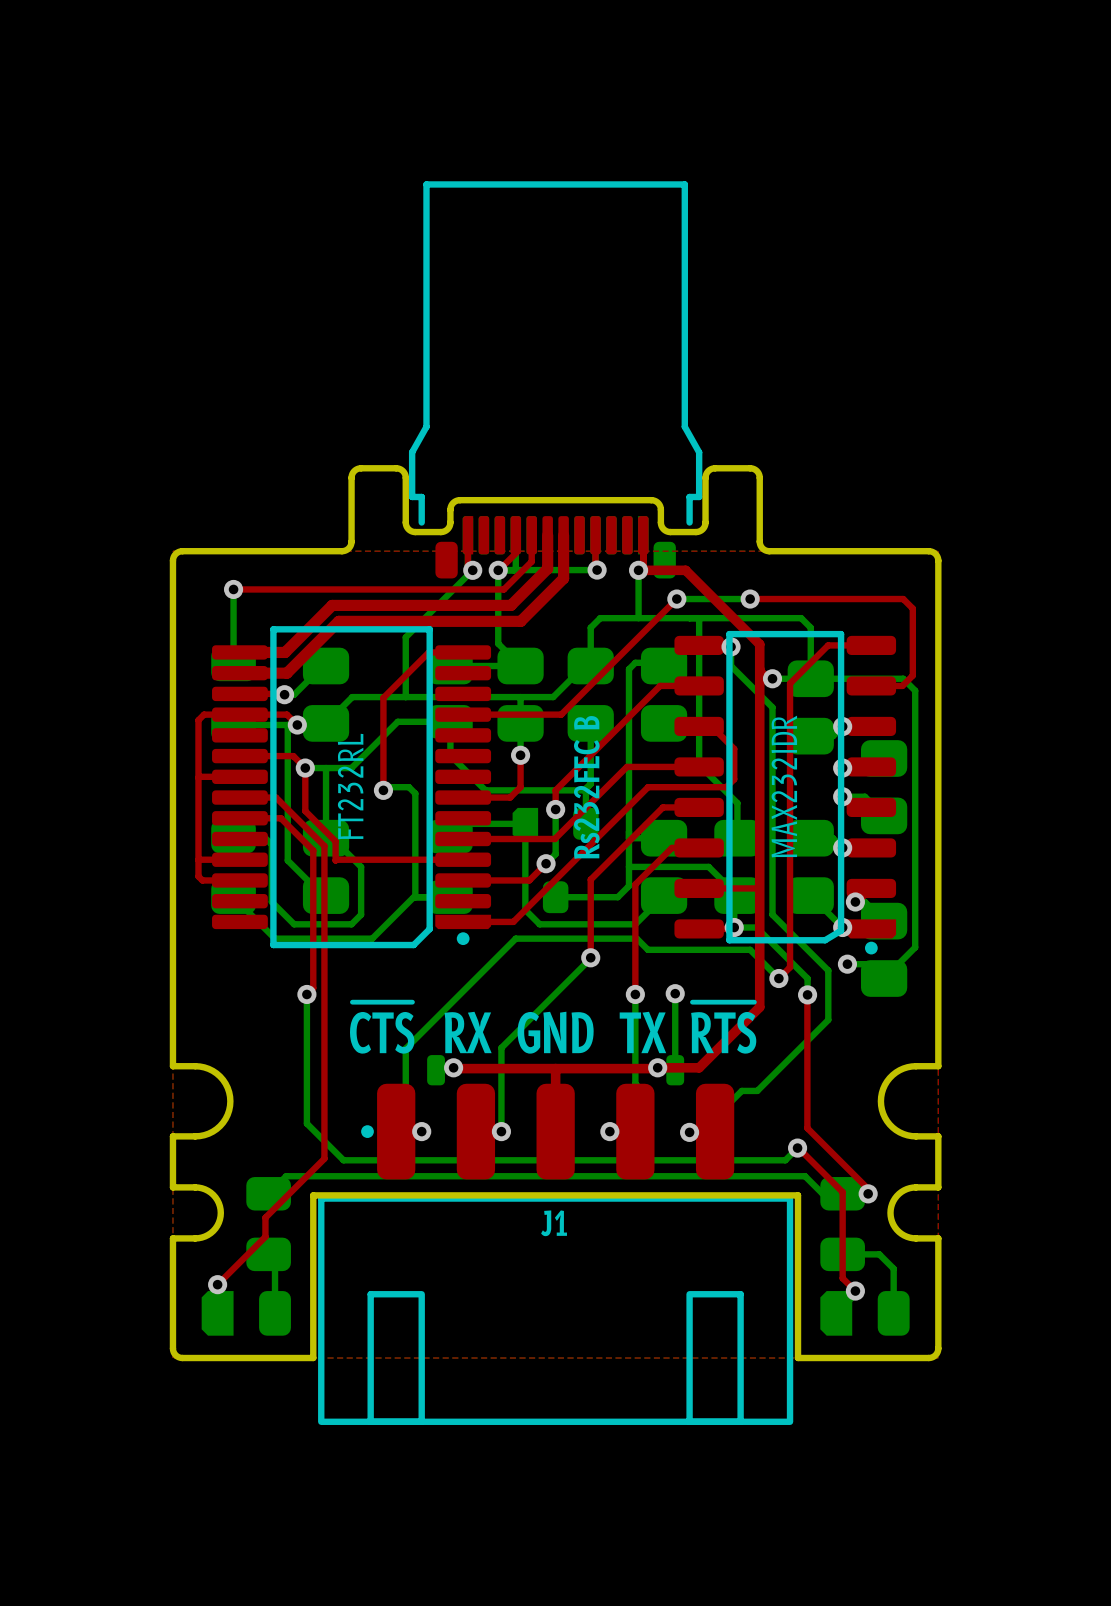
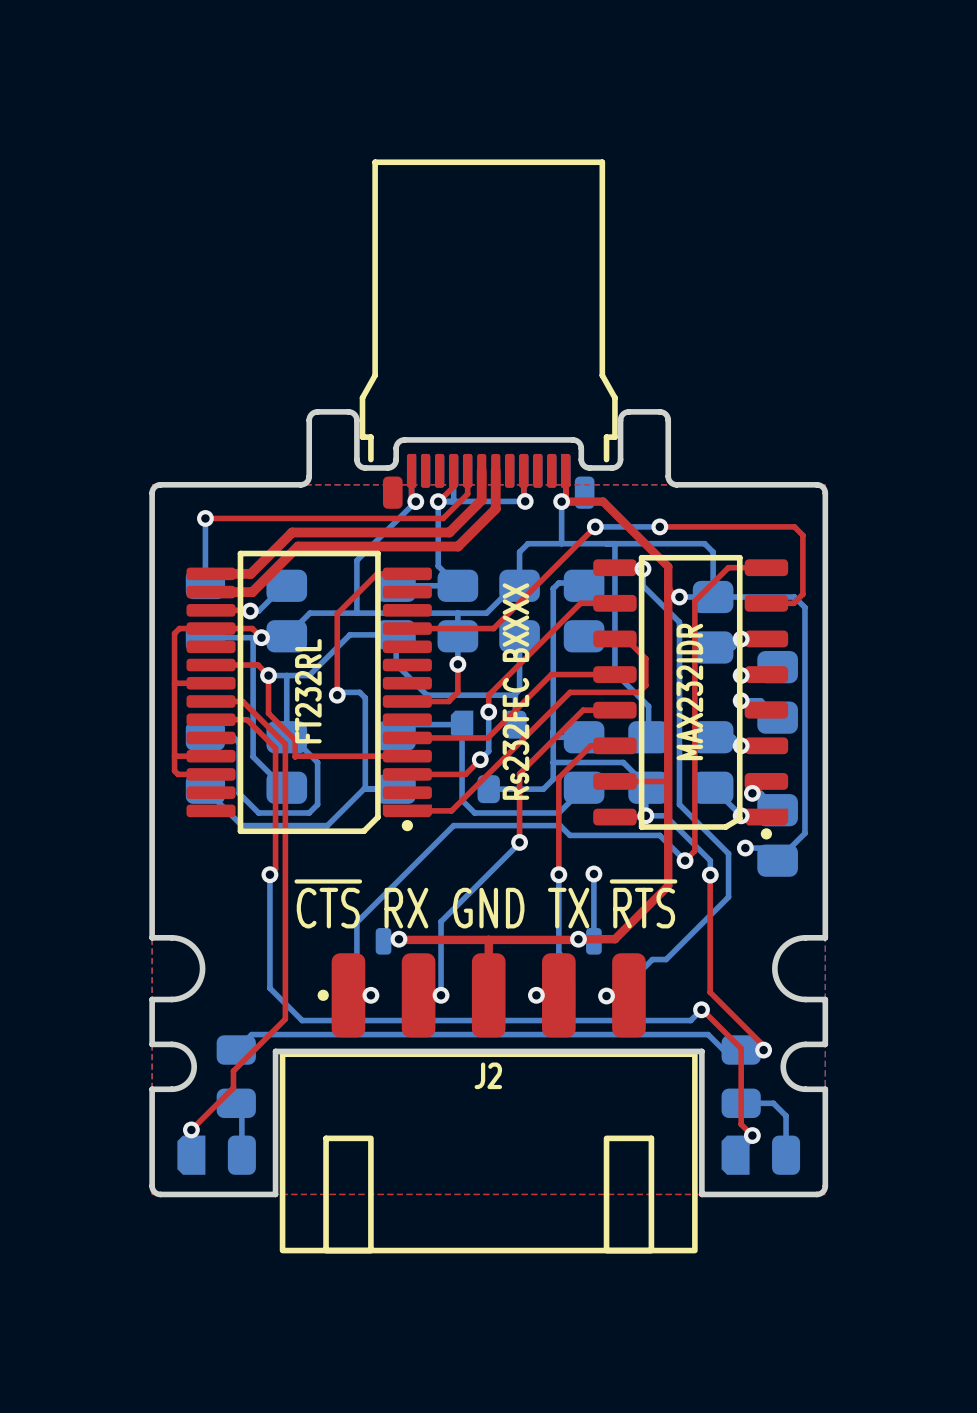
text: Rs232FEC B (586, 787) -> Rs232FEC BXXXX (515, 691)
J1 name: J1 (554, 1223) -> J2 (488, 1075)

